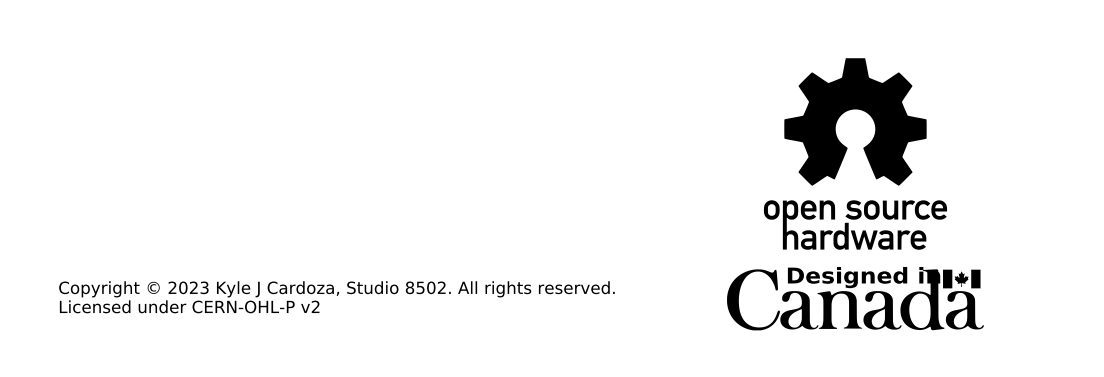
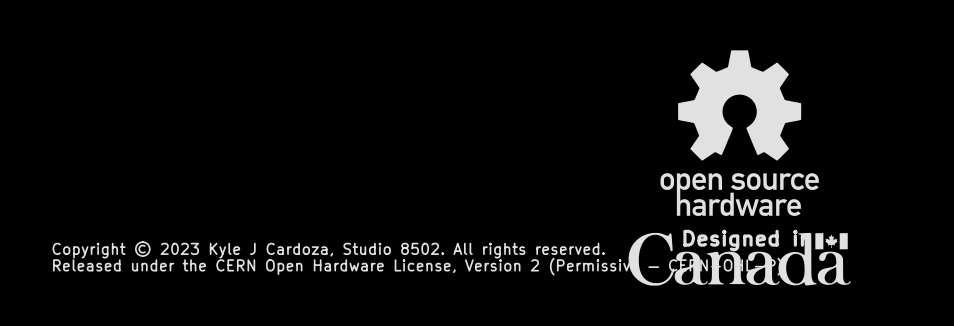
text: Licensed under CERN-OHL-P v2 (189, 306) -> Released under the CERN Open Hardware License, Version 2 (Permissive — CERN-OHL-P) (417, 266)

